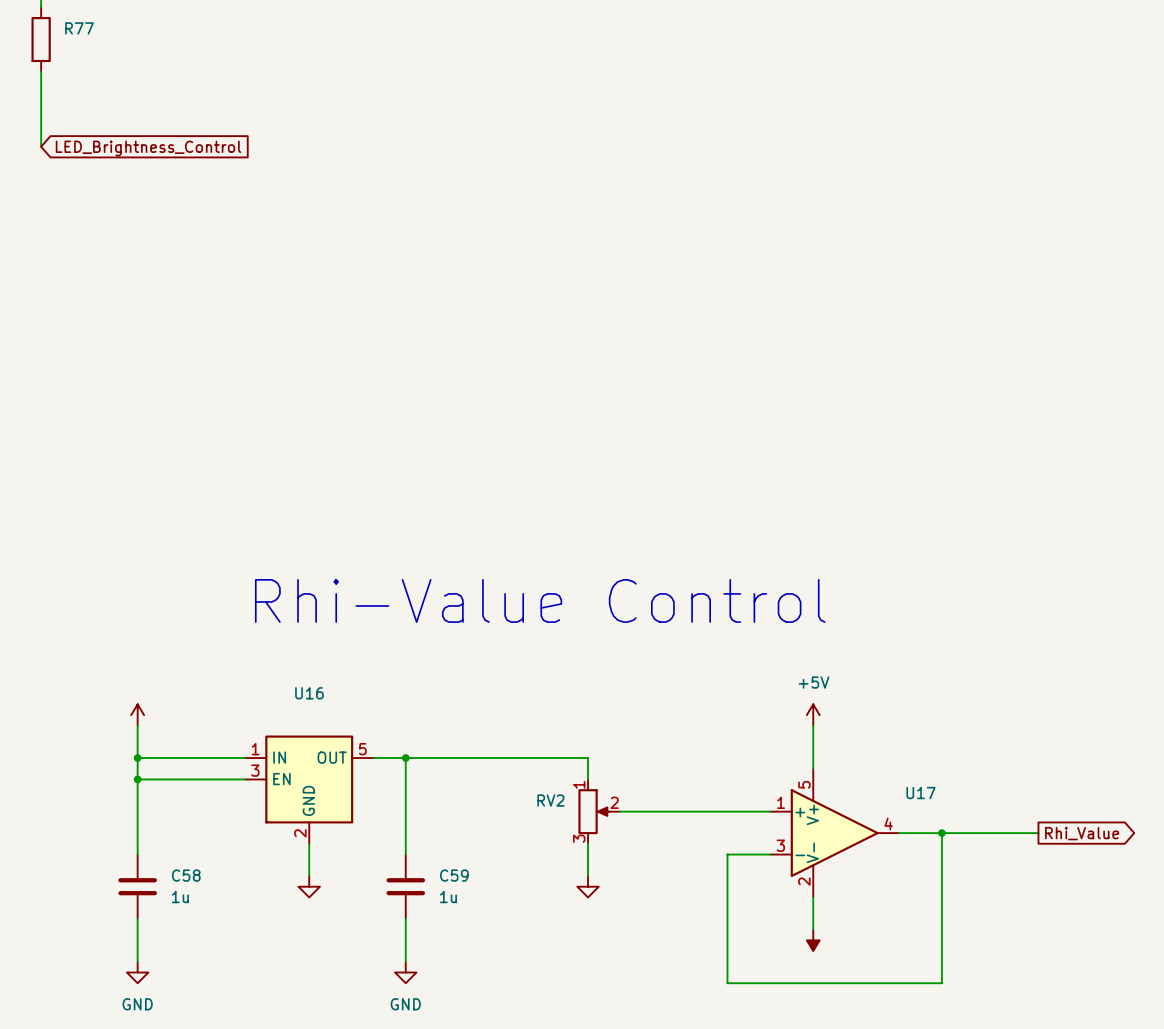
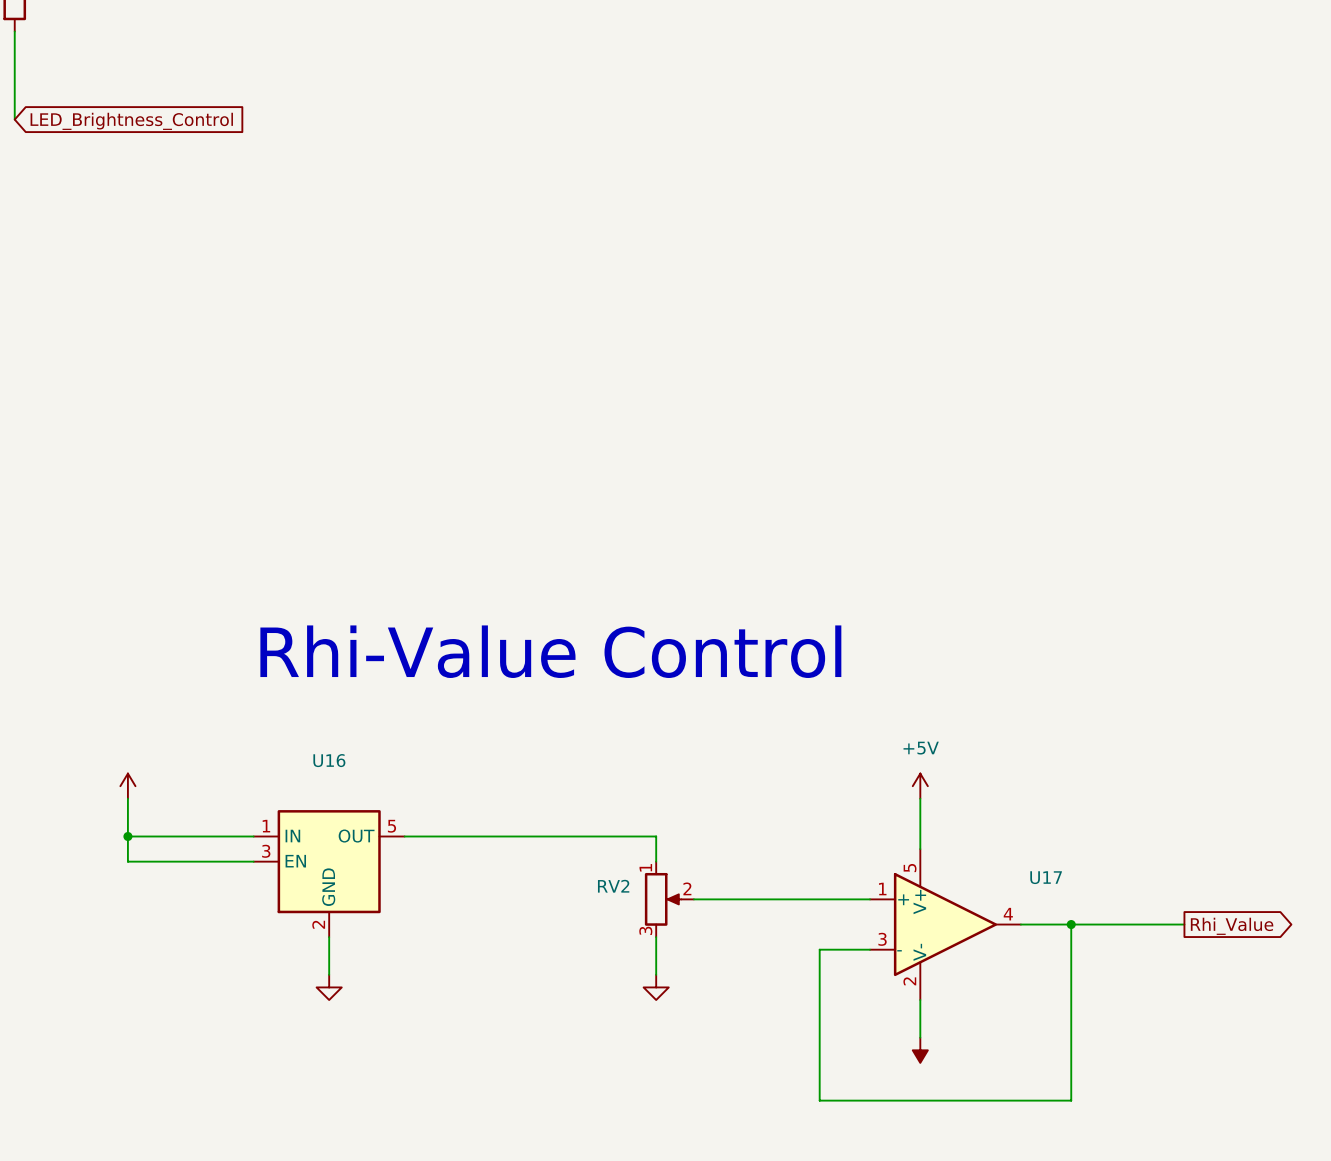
wire: (405, 758) (405, 854) -> none
junction: (405, 758) -> none
wire: (137, 779) (137, 854) -> none
junction: (137, 779) -> none
C58: 1u (137, 886) -> none
C59: 1u (405, 886) -> none
wire: (137, 918) (137, 961) -> none
wire: (405, 918) (405, 961) -> none
power symbol: GND (137, 972) -> none
power symbol: GND (405, 972) -> none

